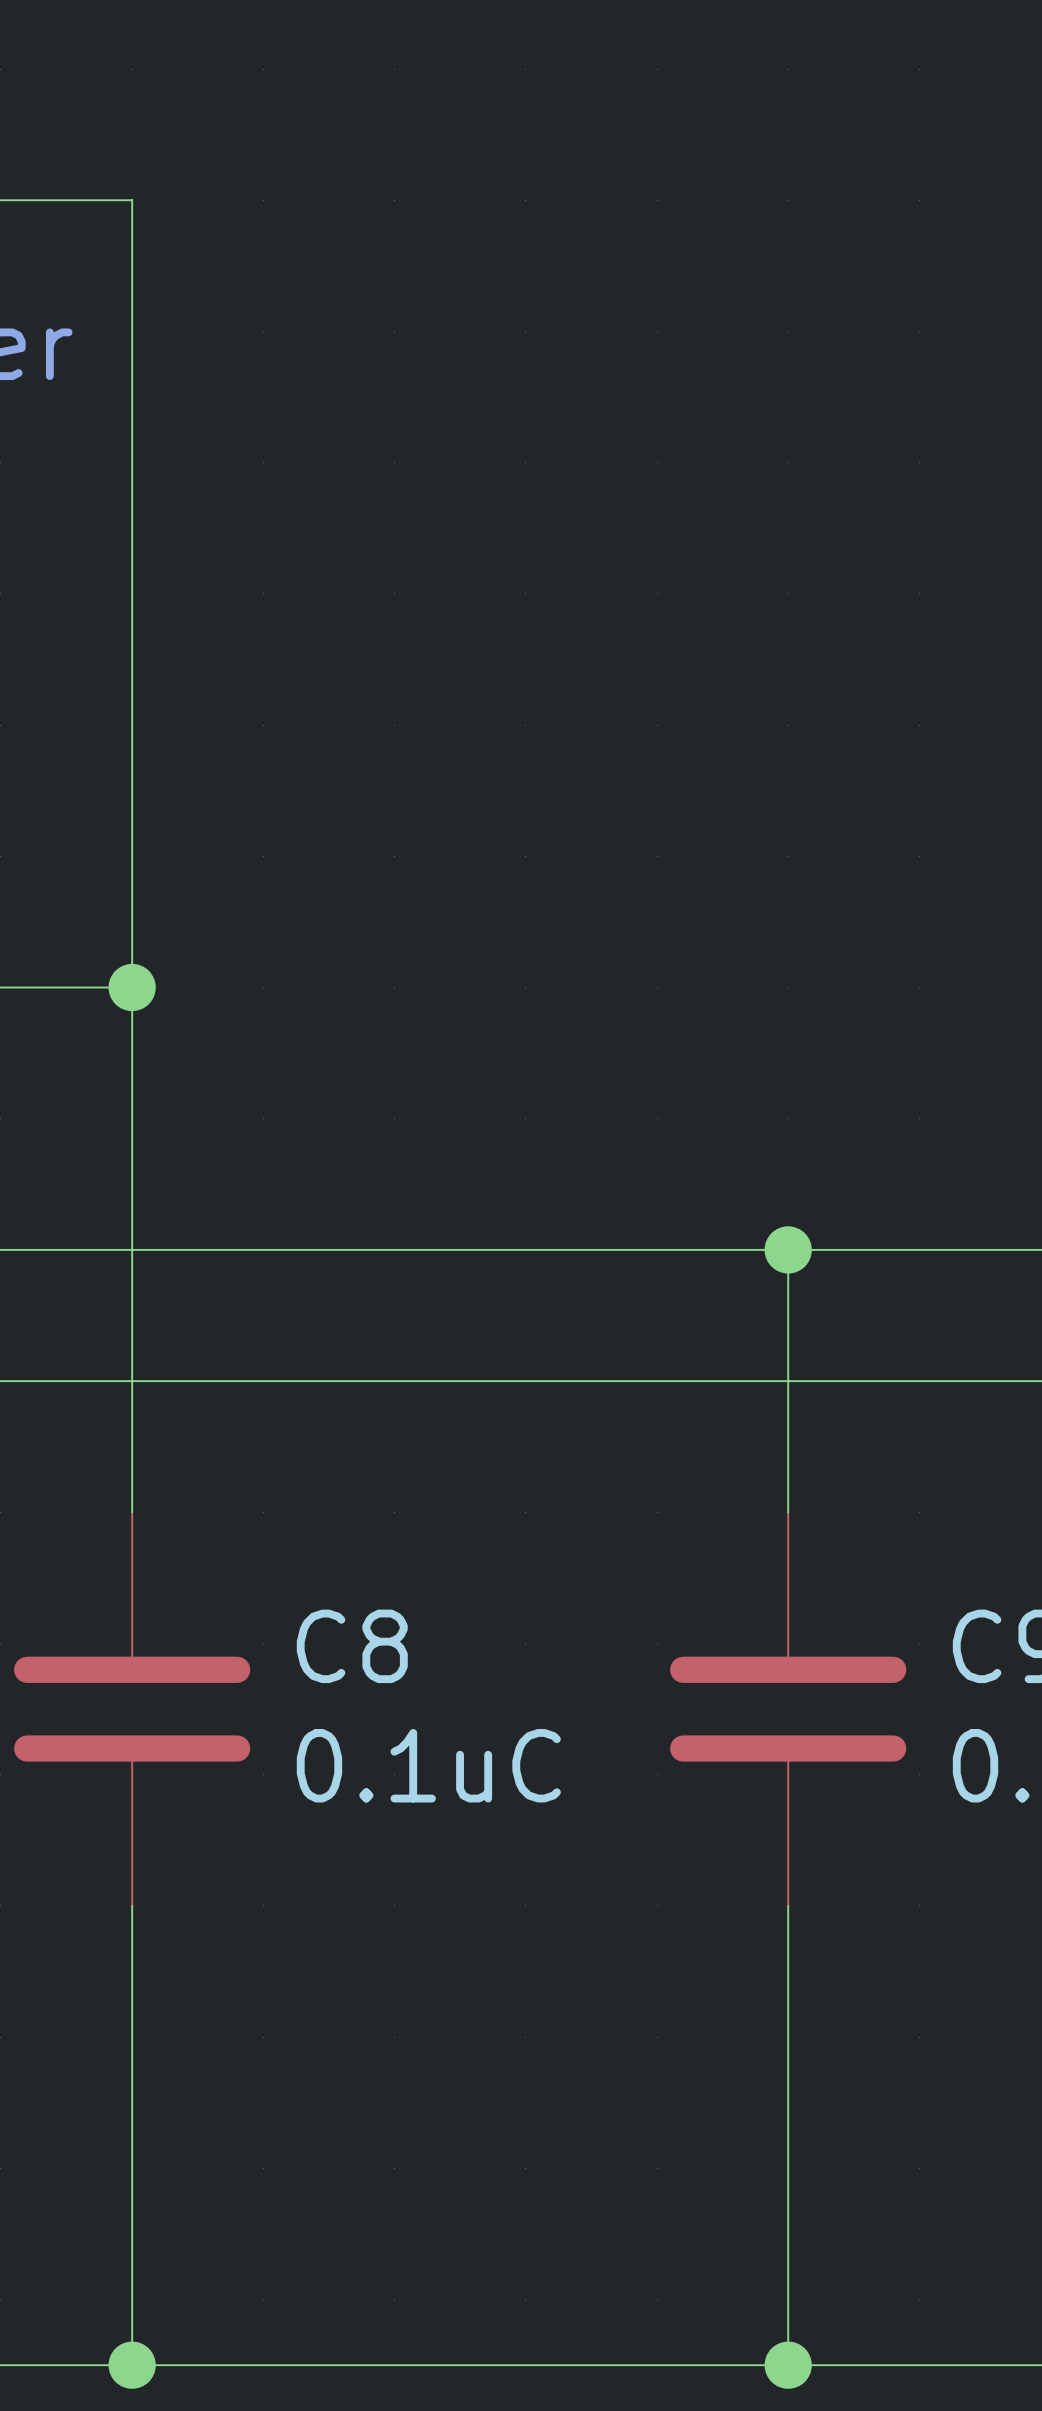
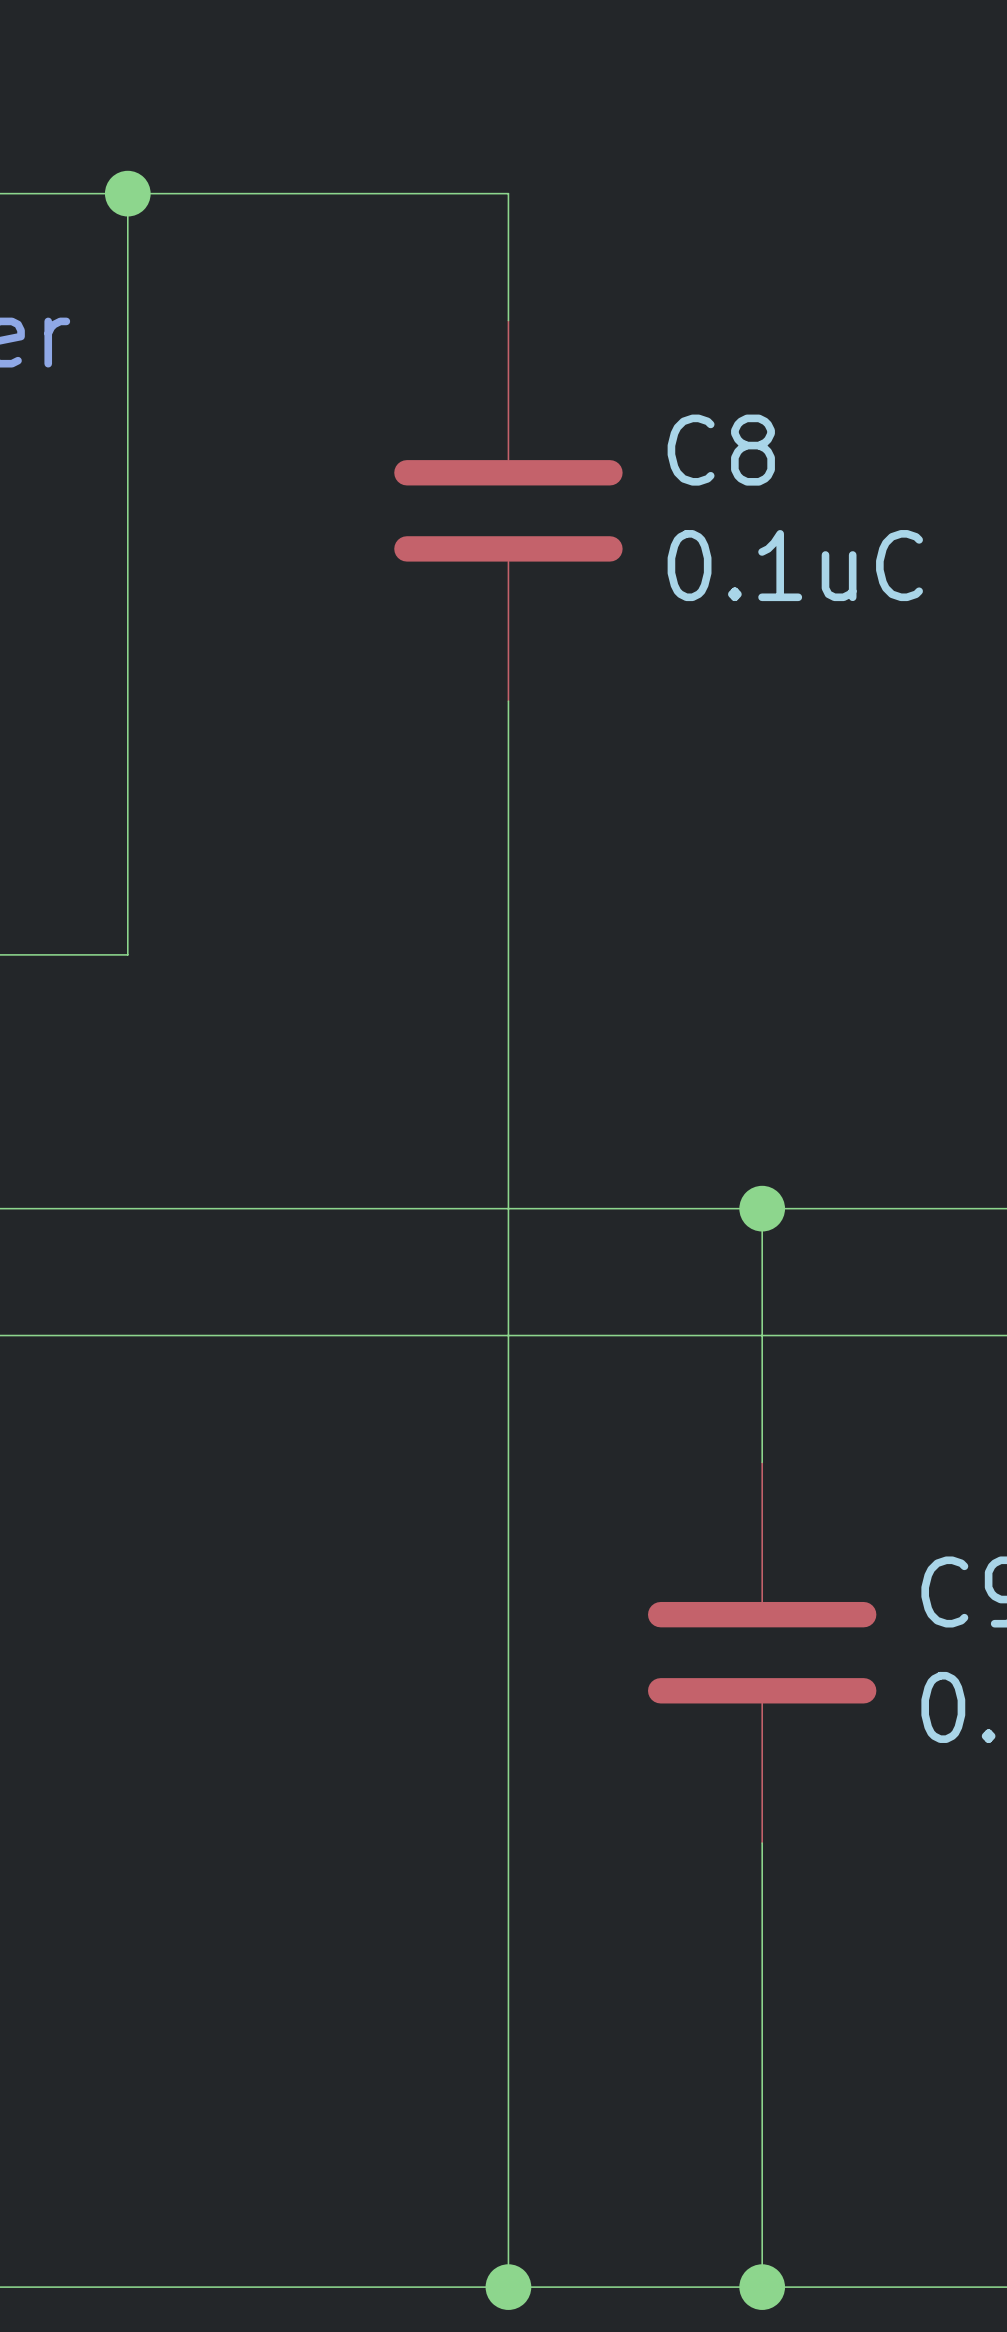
wire: none -> (127, 193) (508, 193) (508, 320)
junction: none -> (127, 193)
wire: none -> (508, 701) (508, 2287)
wire: (132, 987) (132, 1512) -> none
junction: (132, 987) -> none
C8 position: (132, 1709) -> (508, 510)
wire: (132, 1905) (132, 2365) -> none
junction: (132, 2365) -> none
junction: none -> (508, 2287)

